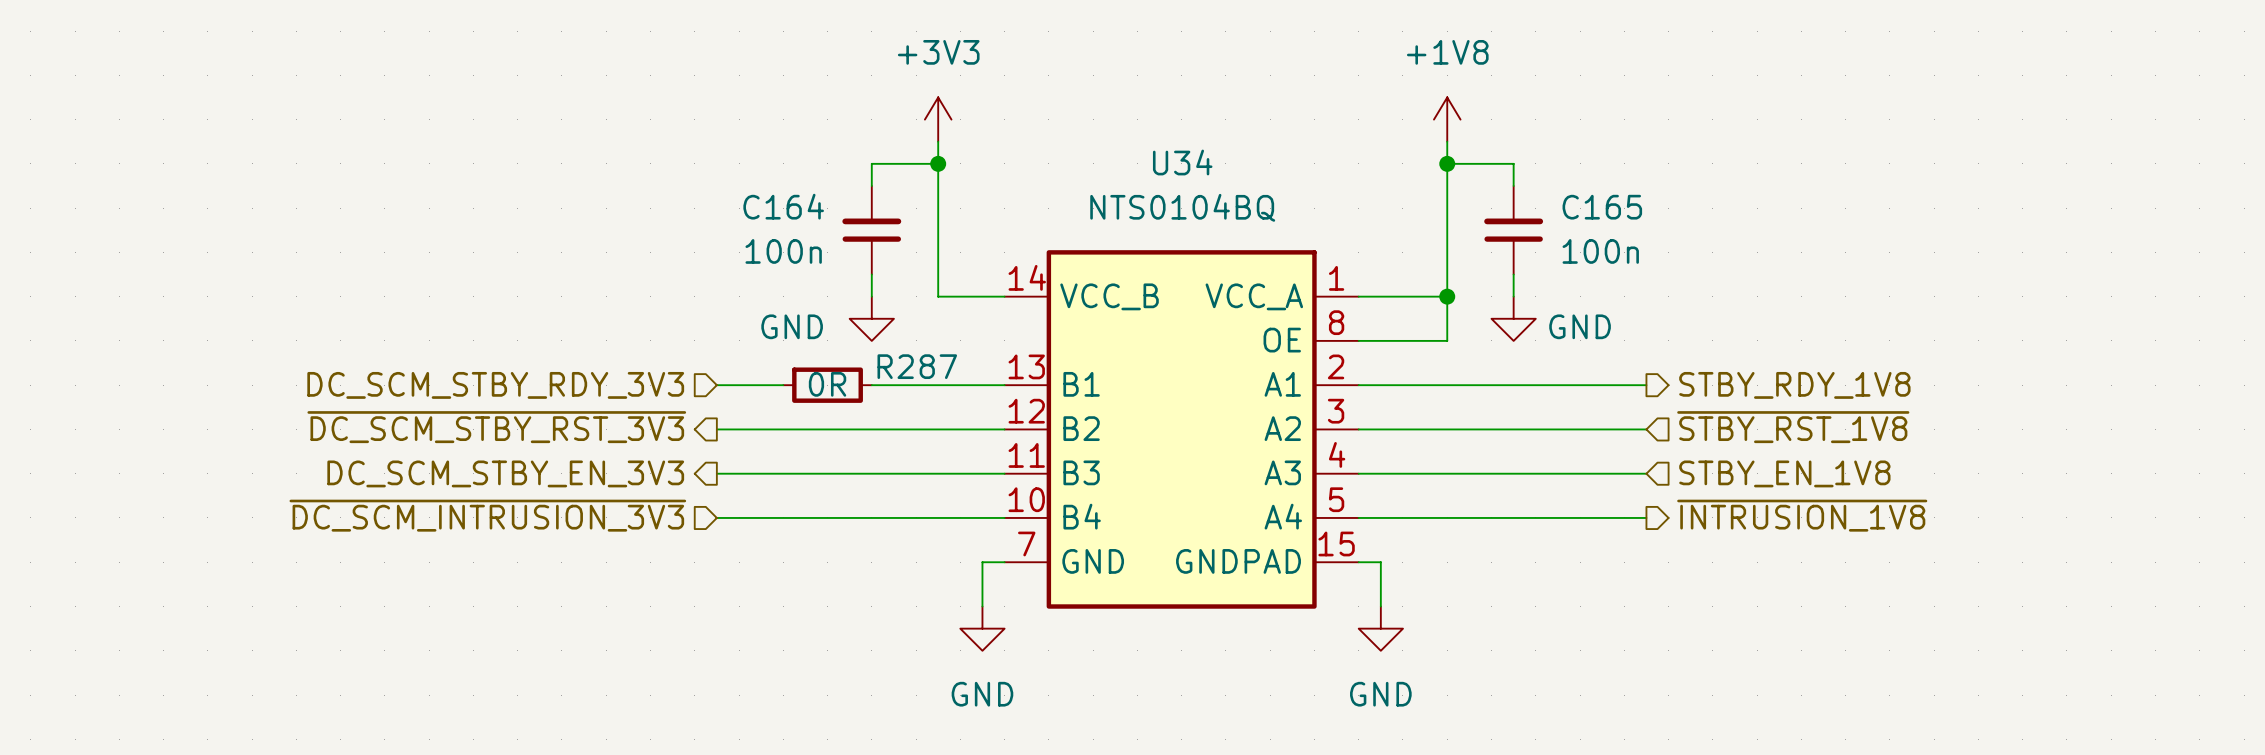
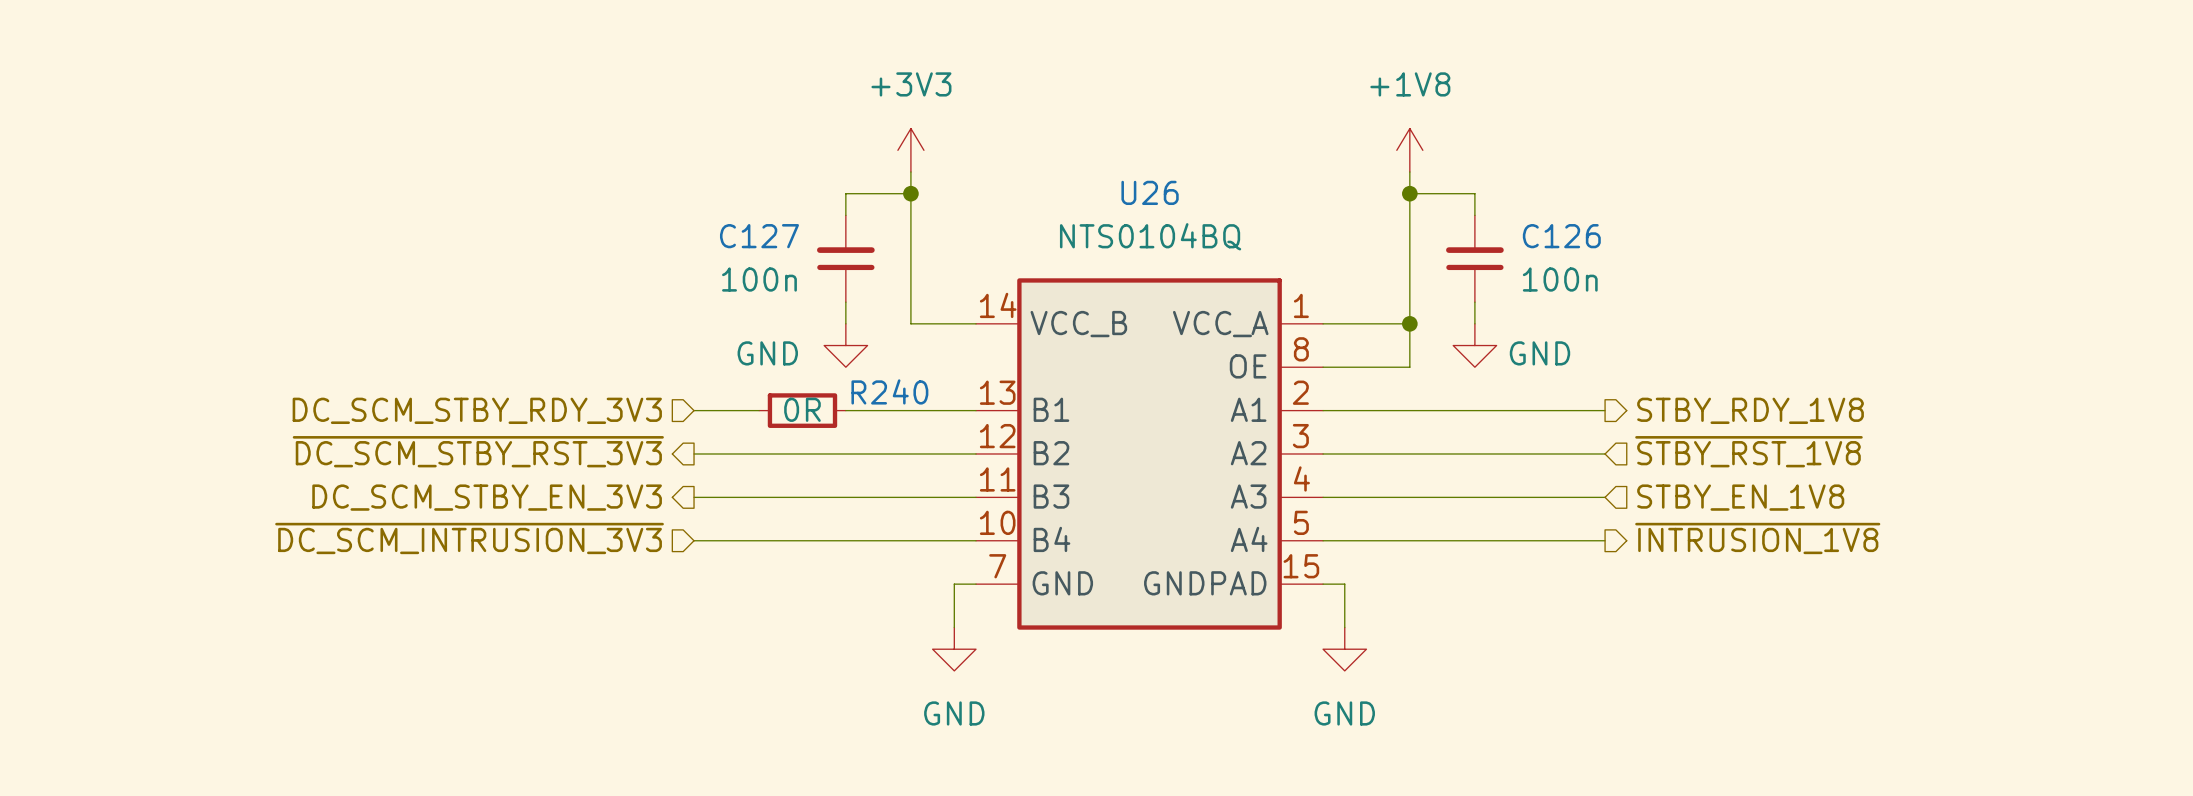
U34 name: U34 (1182, 162) -> U26 (1150, 192)
C164 name: C164 (783, 206) -> C127 (759, 236)
C165 name: C165 (1602, 207) -> C126 (1561, 236)
R287 name: R287 (917, 366) -> R240 (889, 391)

